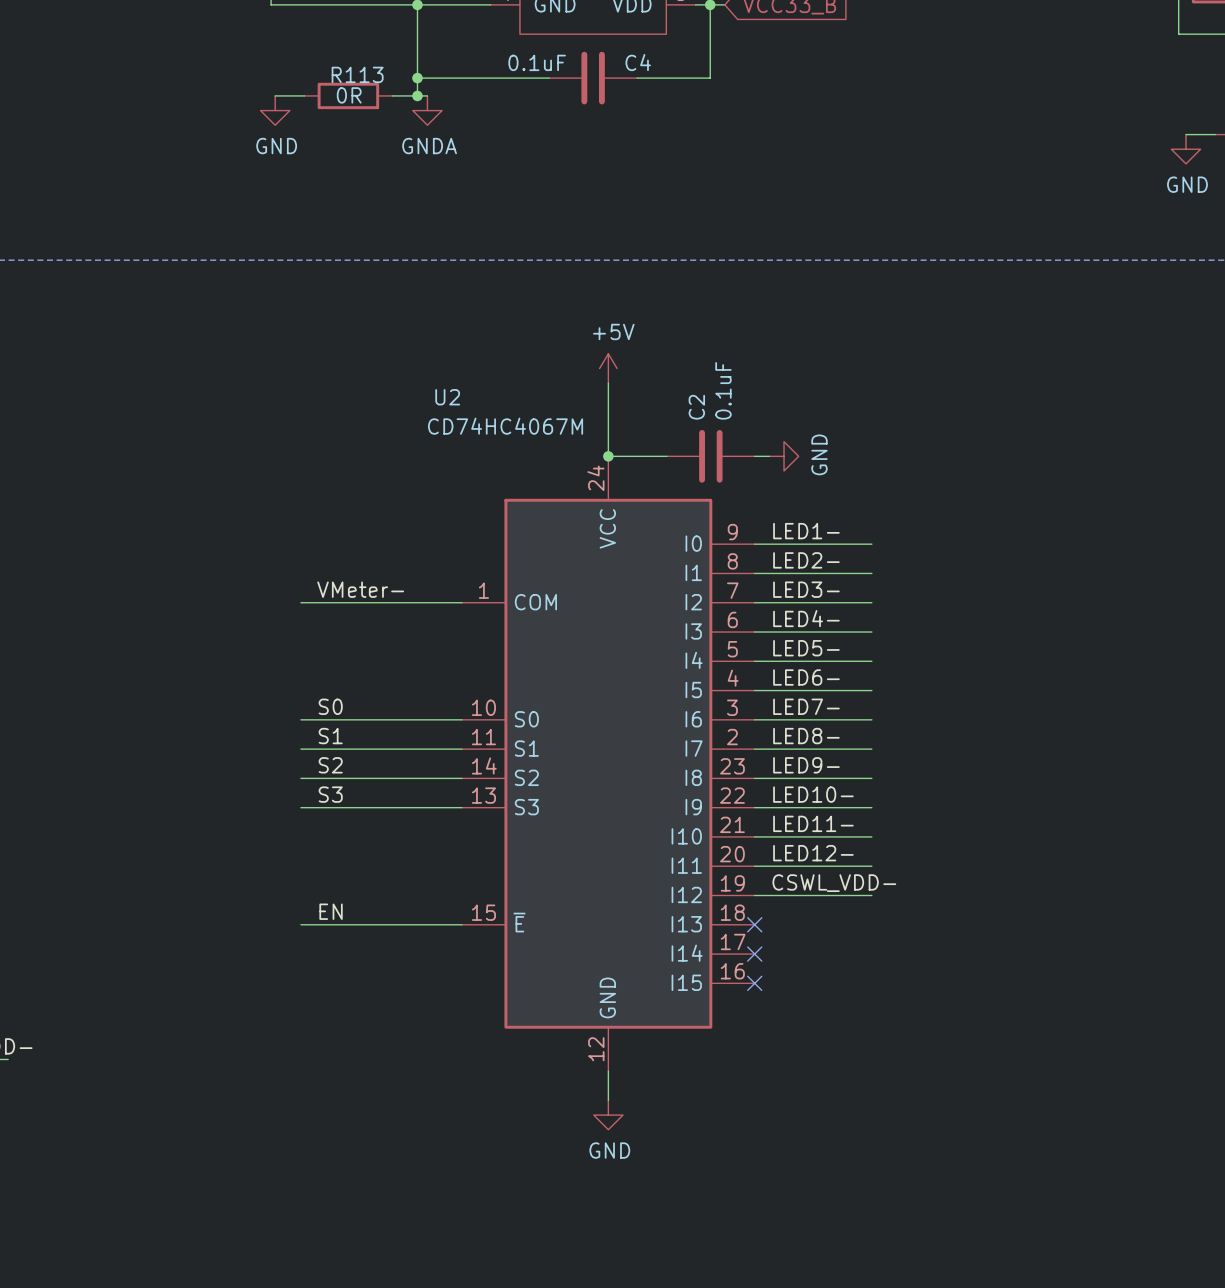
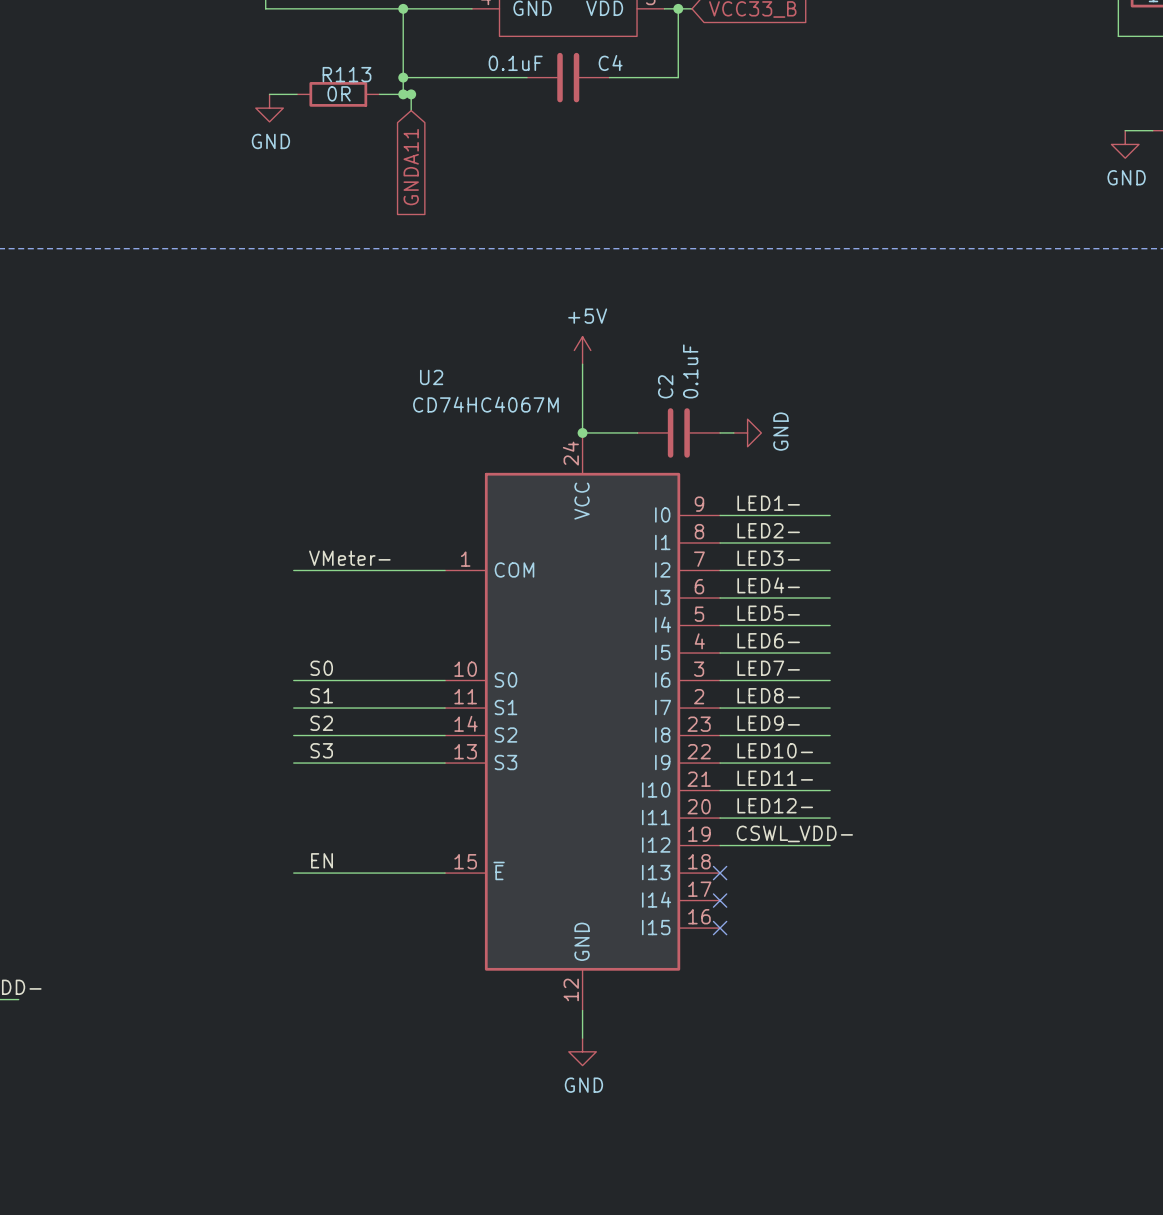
wire: none -> (411, 94) (411, 110)
junction: none -> (411, 94)
power symbol: GNDA (427, 110) -> none
global label: none -> GNDA11 (411, 167)

